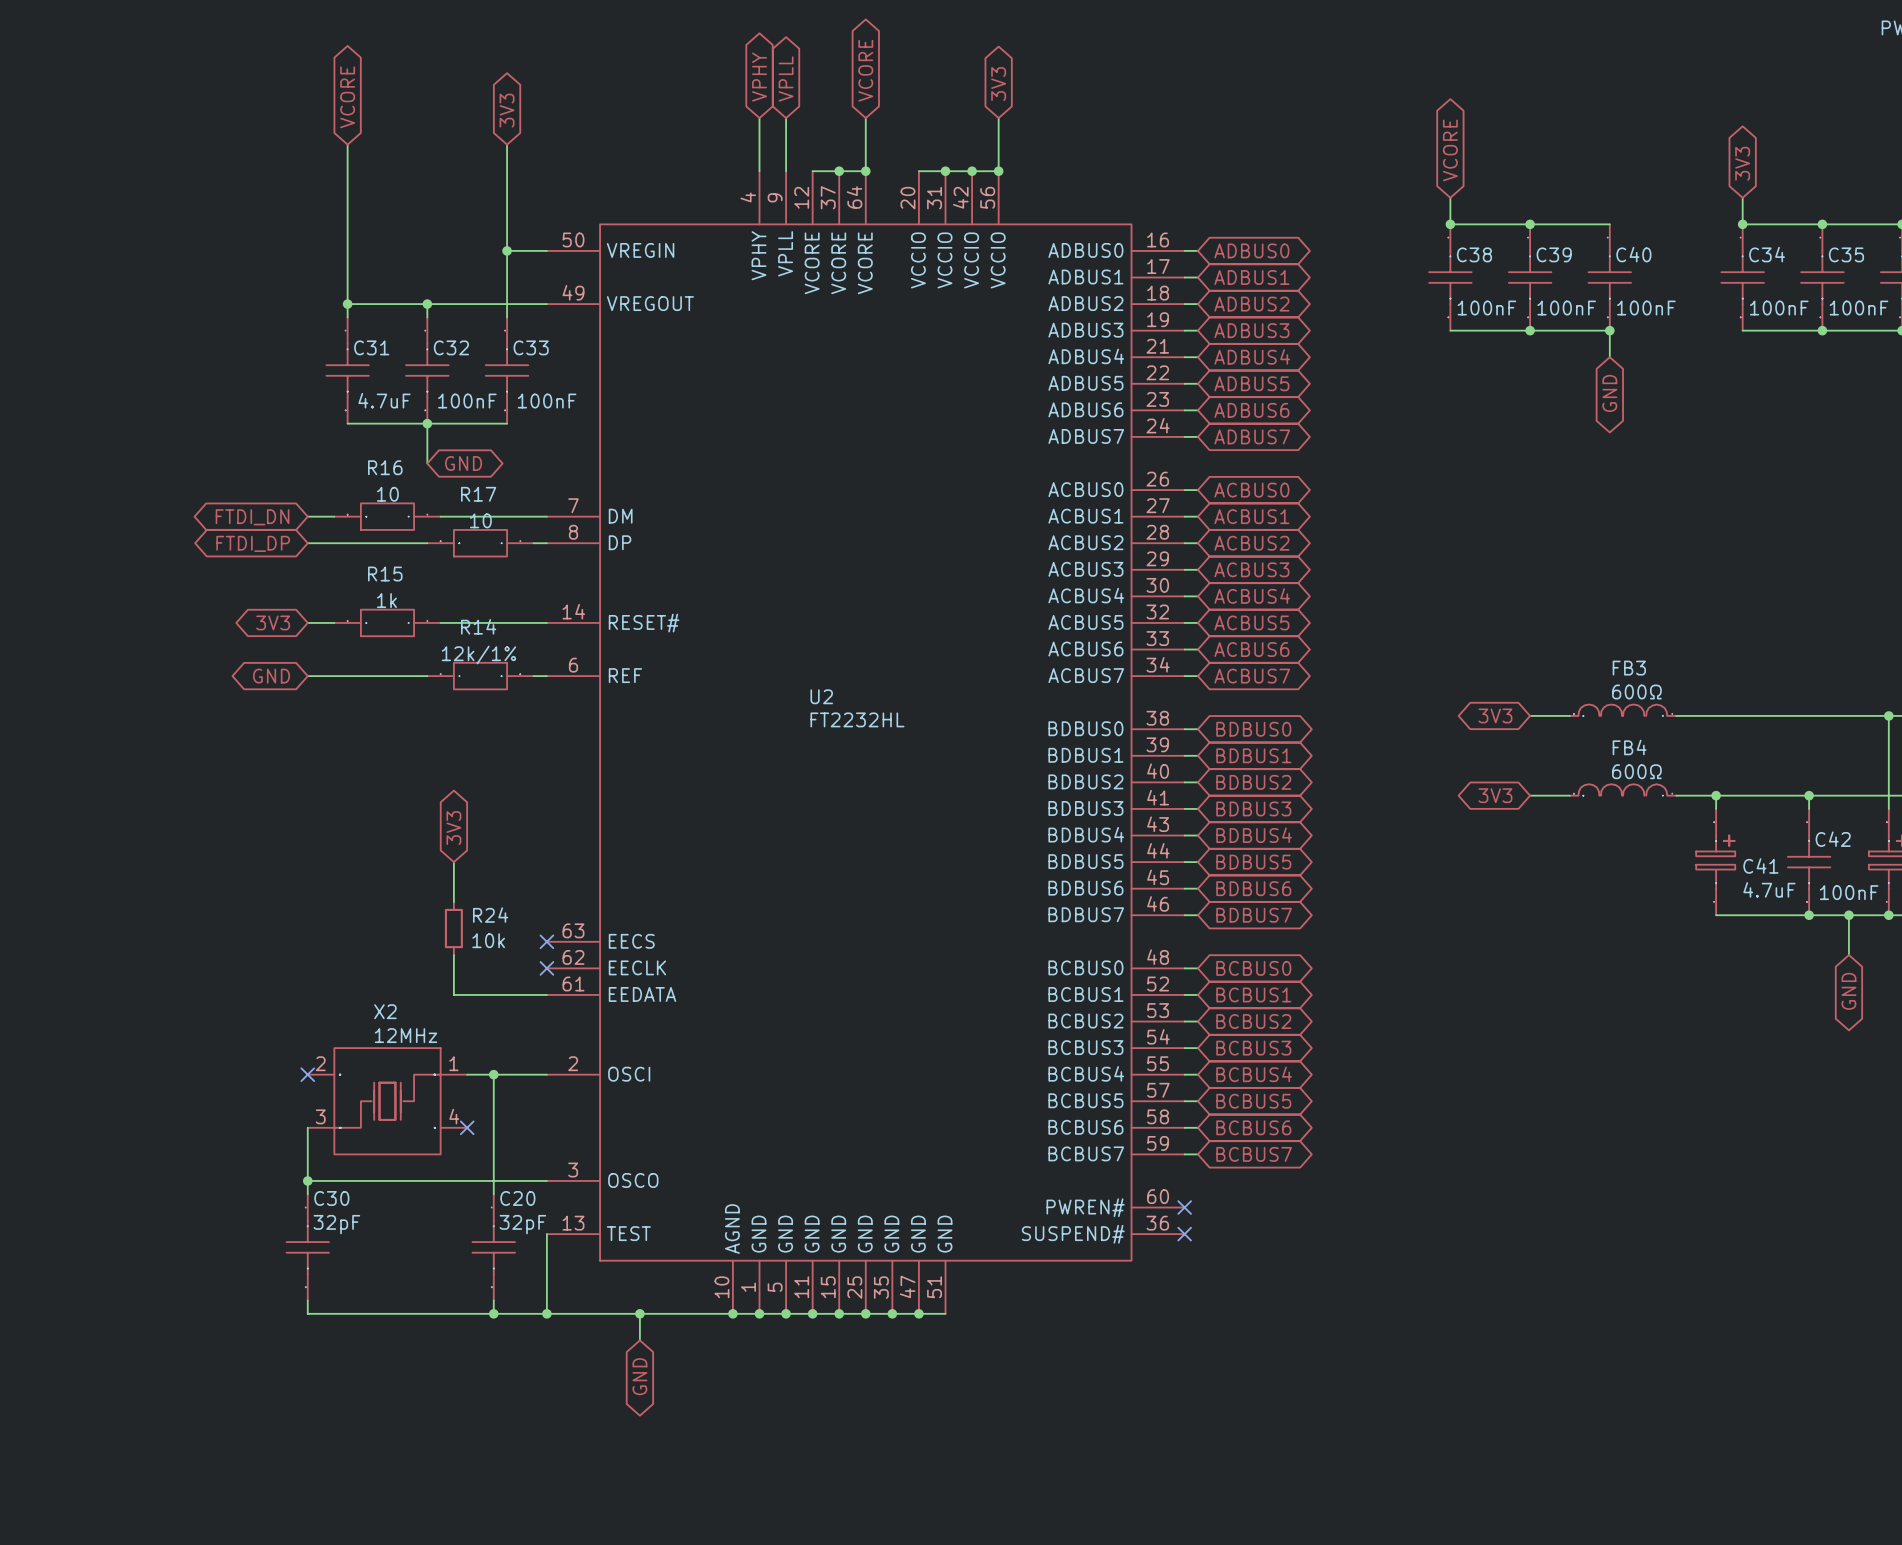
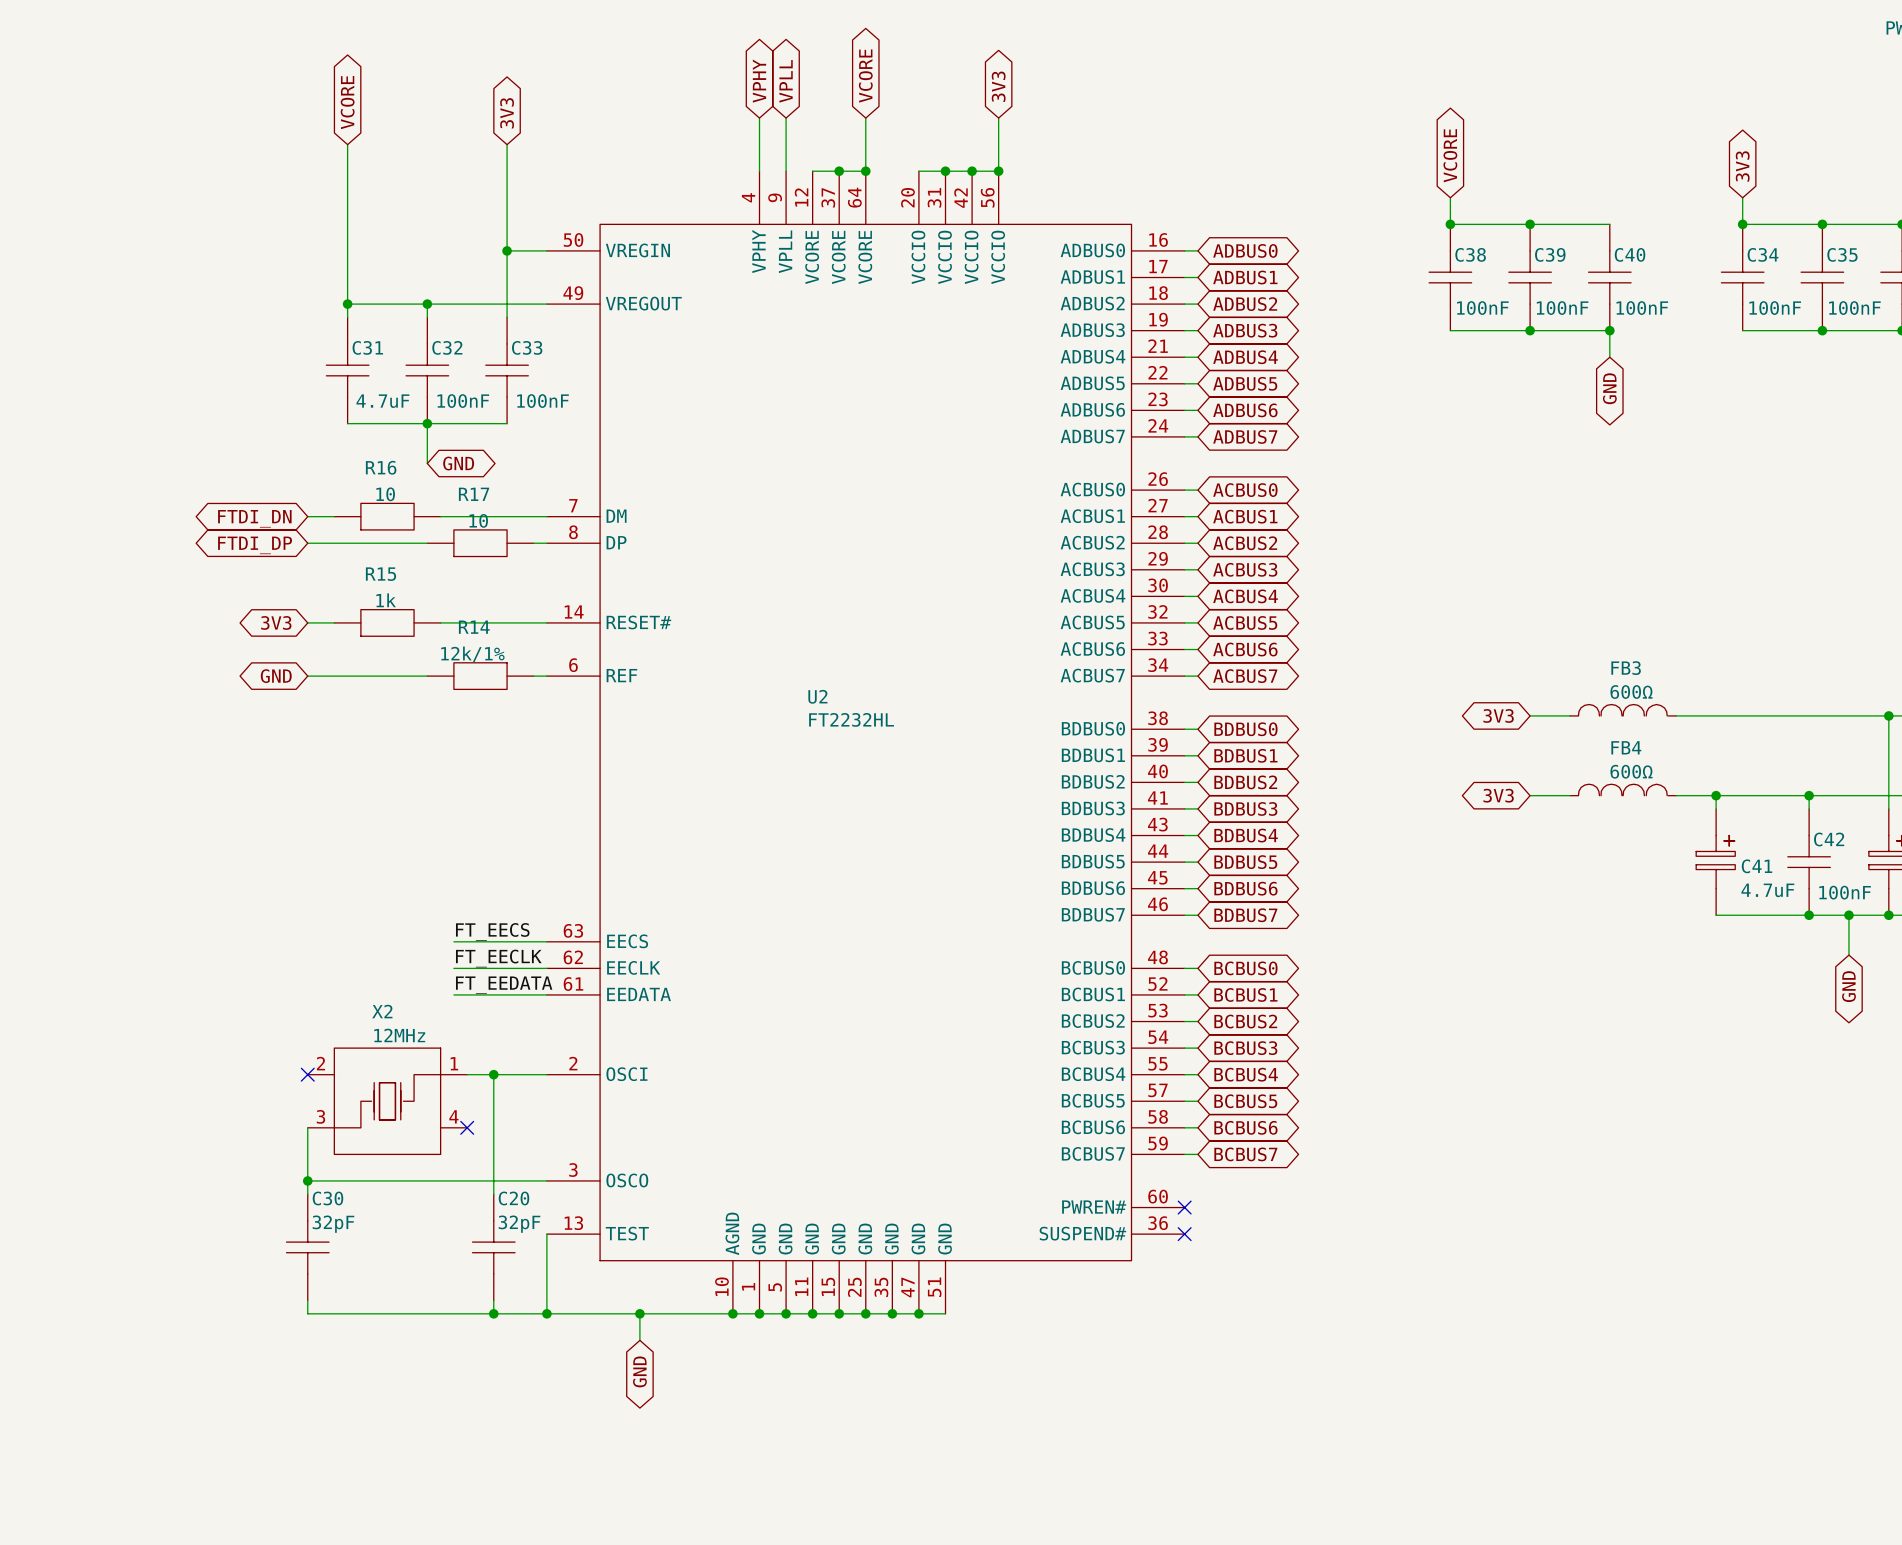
global label: 3V3 (453, 828) -> none
wire: (453, 862) (453, 901) -> none
R24: 10k (453, 928) -> none
label: none -> FT_EECS (492, 931)
wire: none -> (453, 941) (546, 941)
no-connect mark: (546, 941) -> none
wire: (453, 955) (453, 994) -> none
label: none -> FT_EECLK (498, 958)
wire: none -> (453, 968) (546, 968)
no-connect mark: (546, 968) -> none
label: none -> FT_EEDATA (504, 985)

